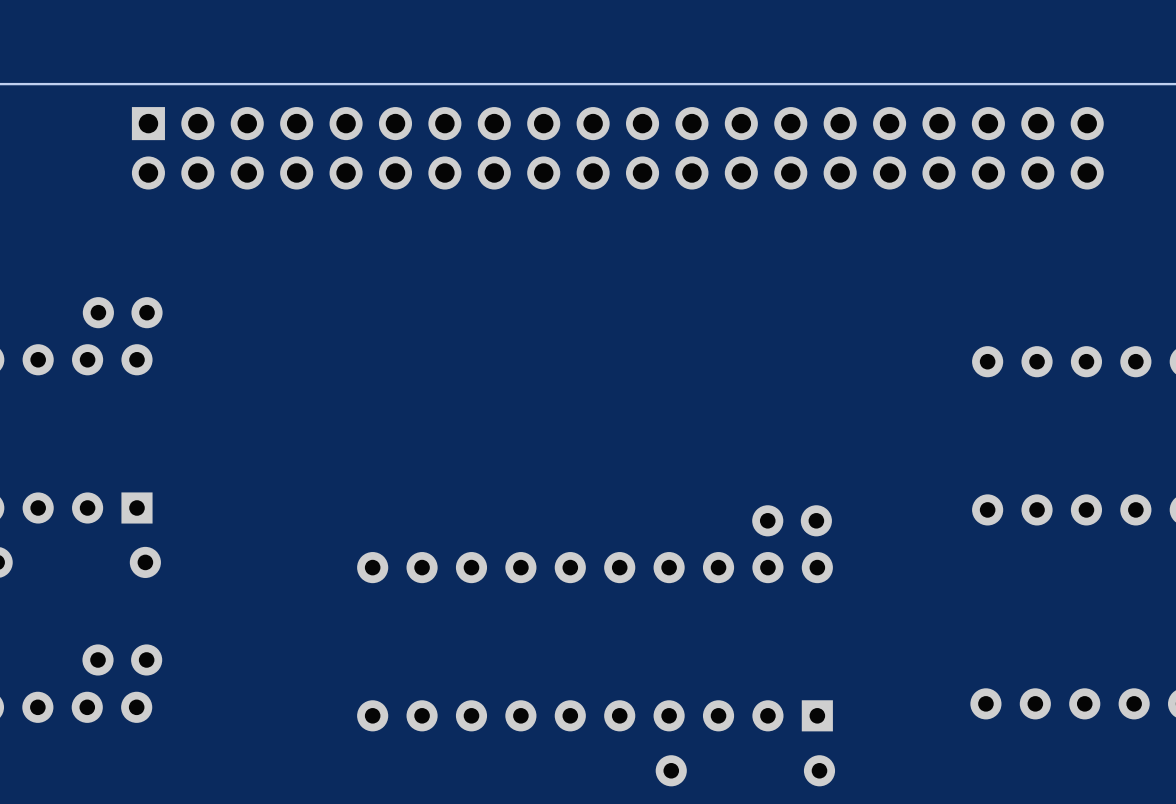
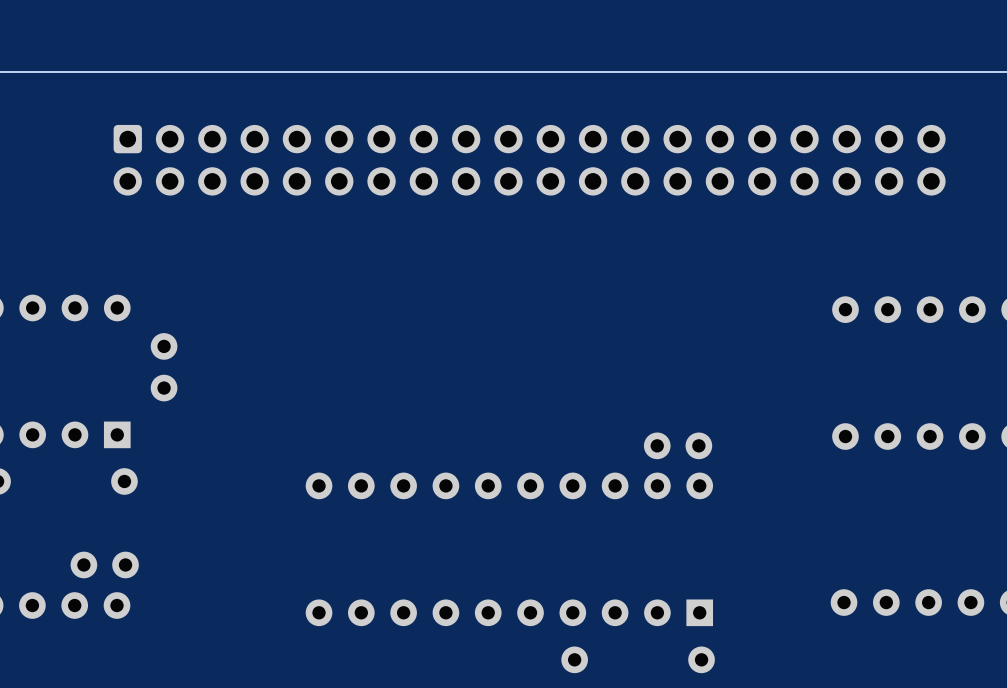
part: (617, 148) -> none
part: none -> (529, 160)
part rotation: 0° (122, 312) -> 90° clockwise (164, 367)
part position: (122, 312) -> (164, 367)

